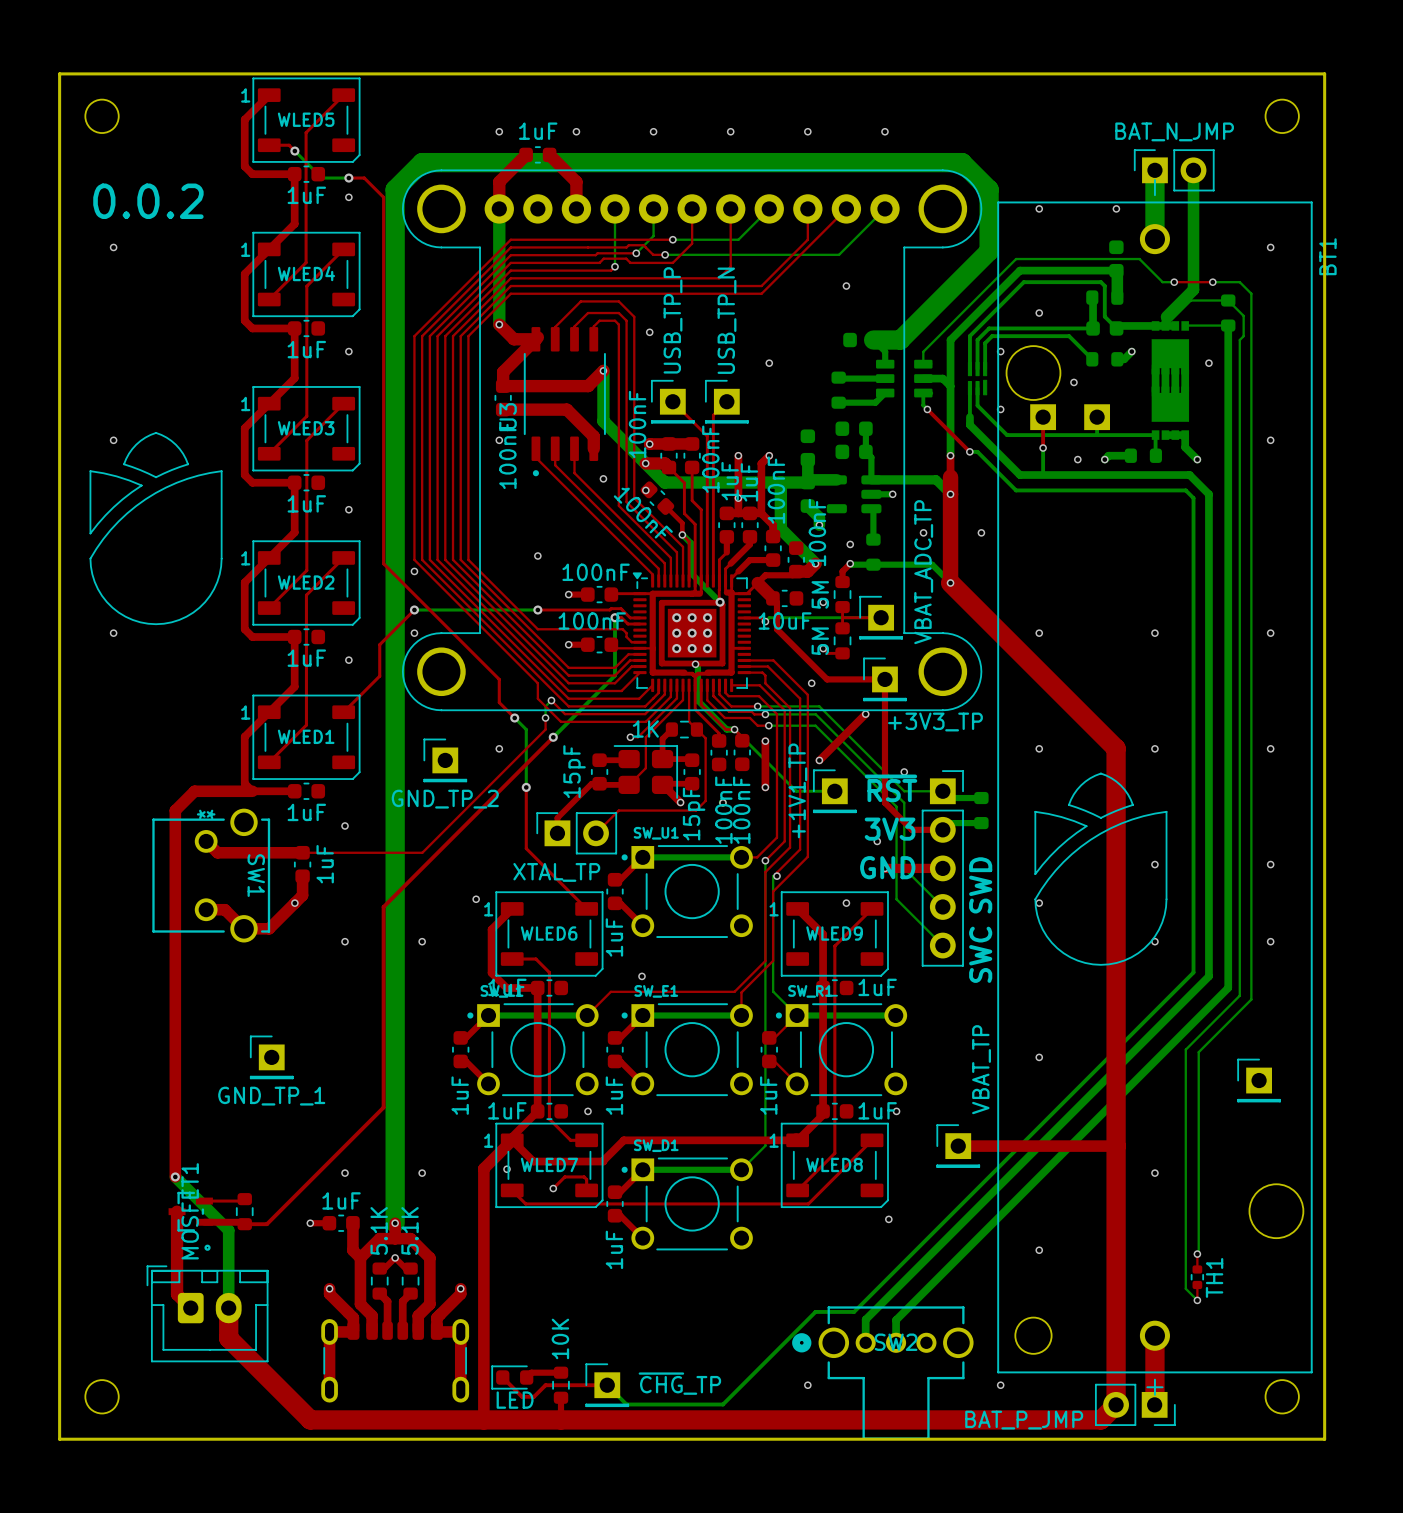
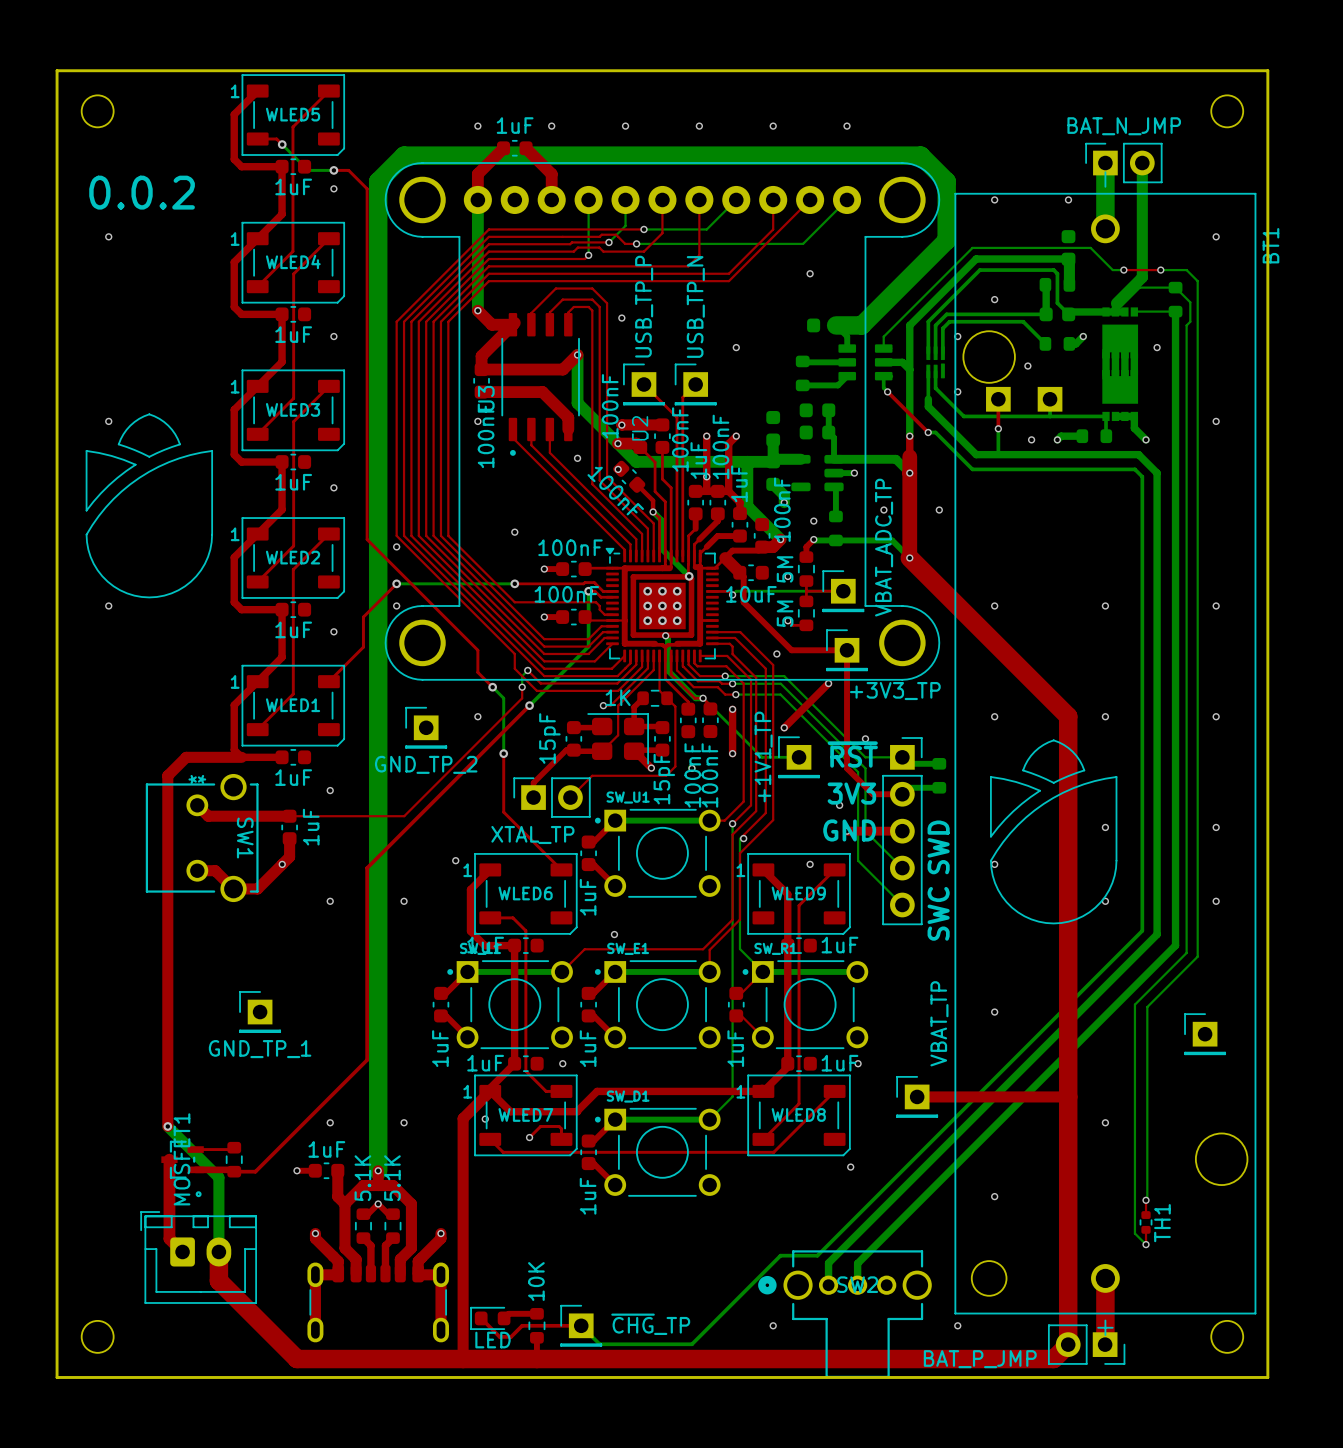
U2 name: none -> U2 (640, 428)
part value: 1uF (749, 482) -> 100nF (720, 446)
part value: 100nF (776, 490) -> 1uF (739, 483)

